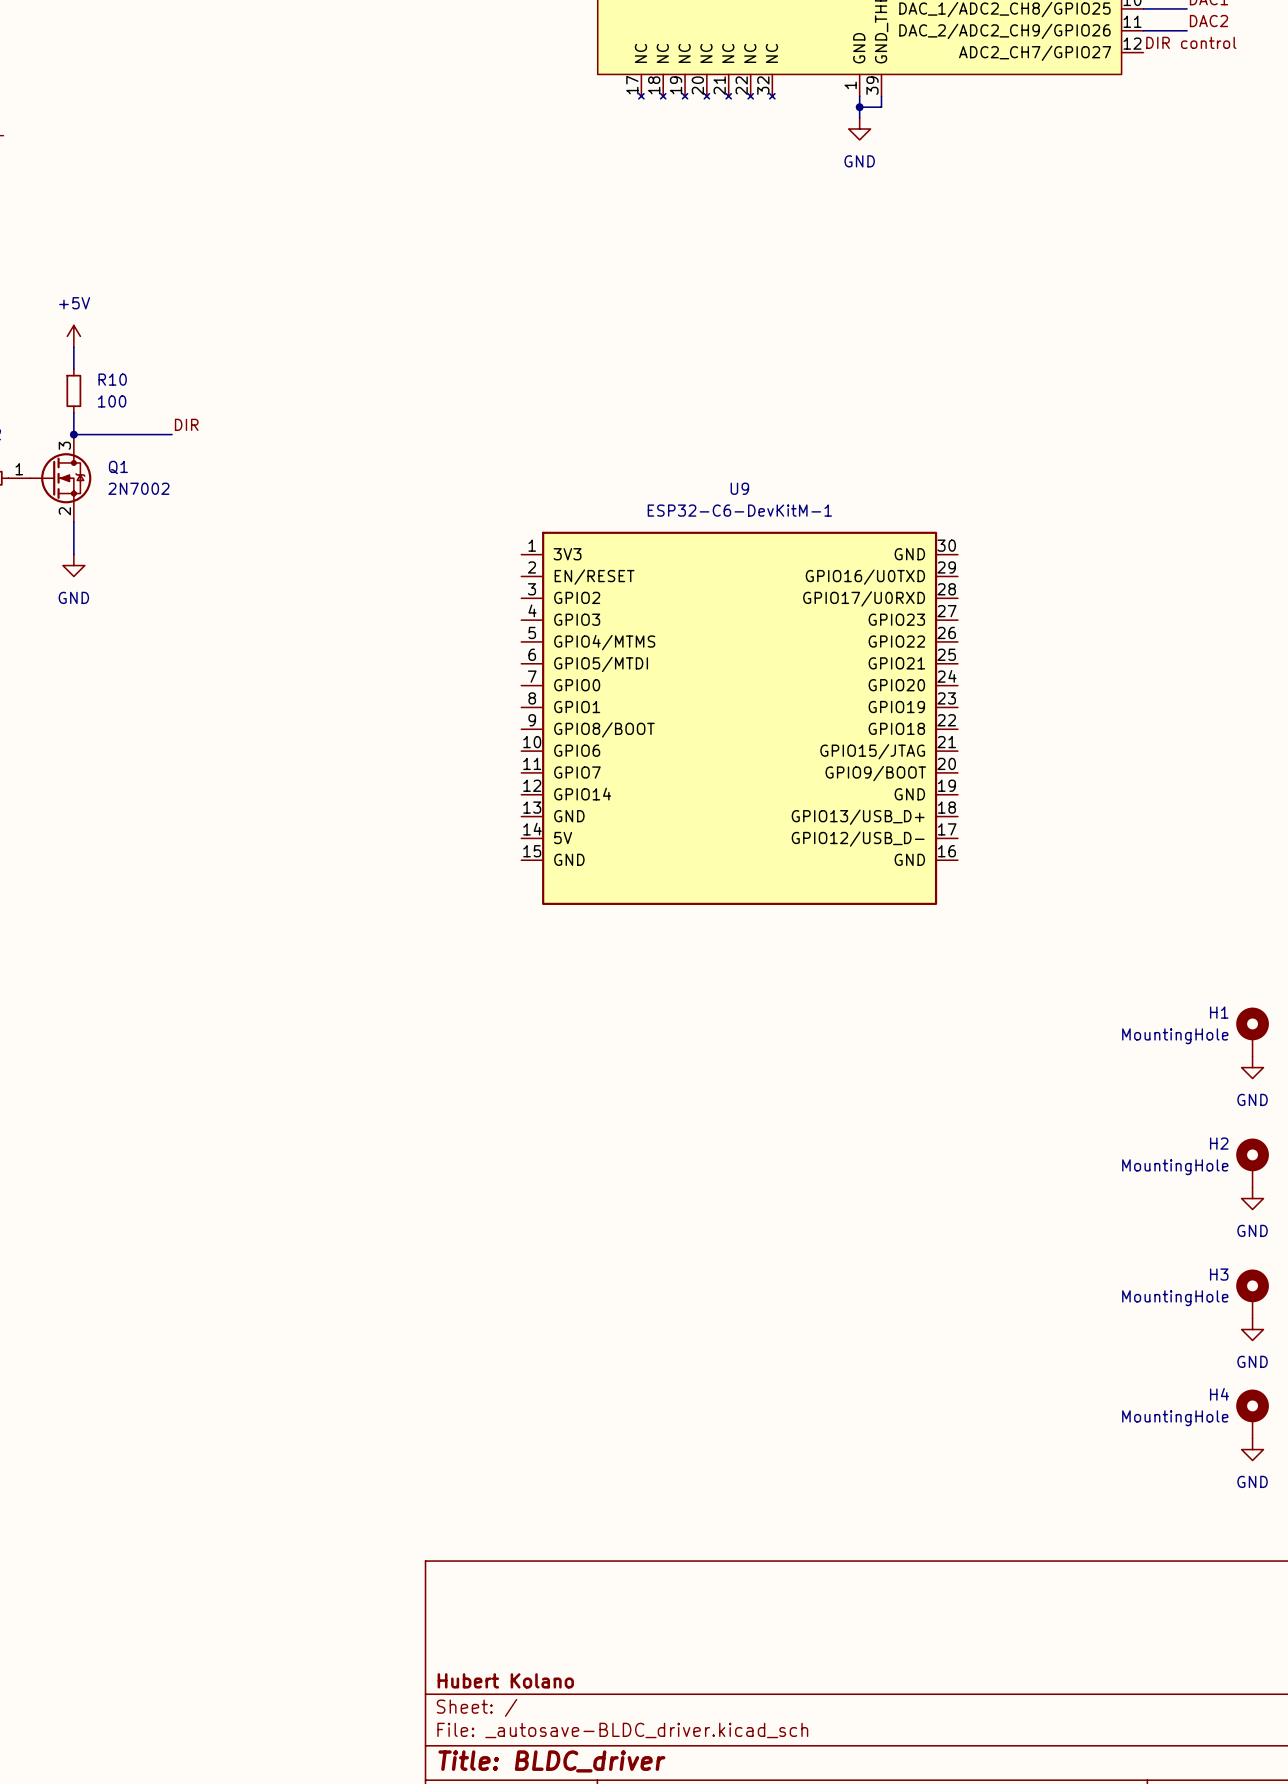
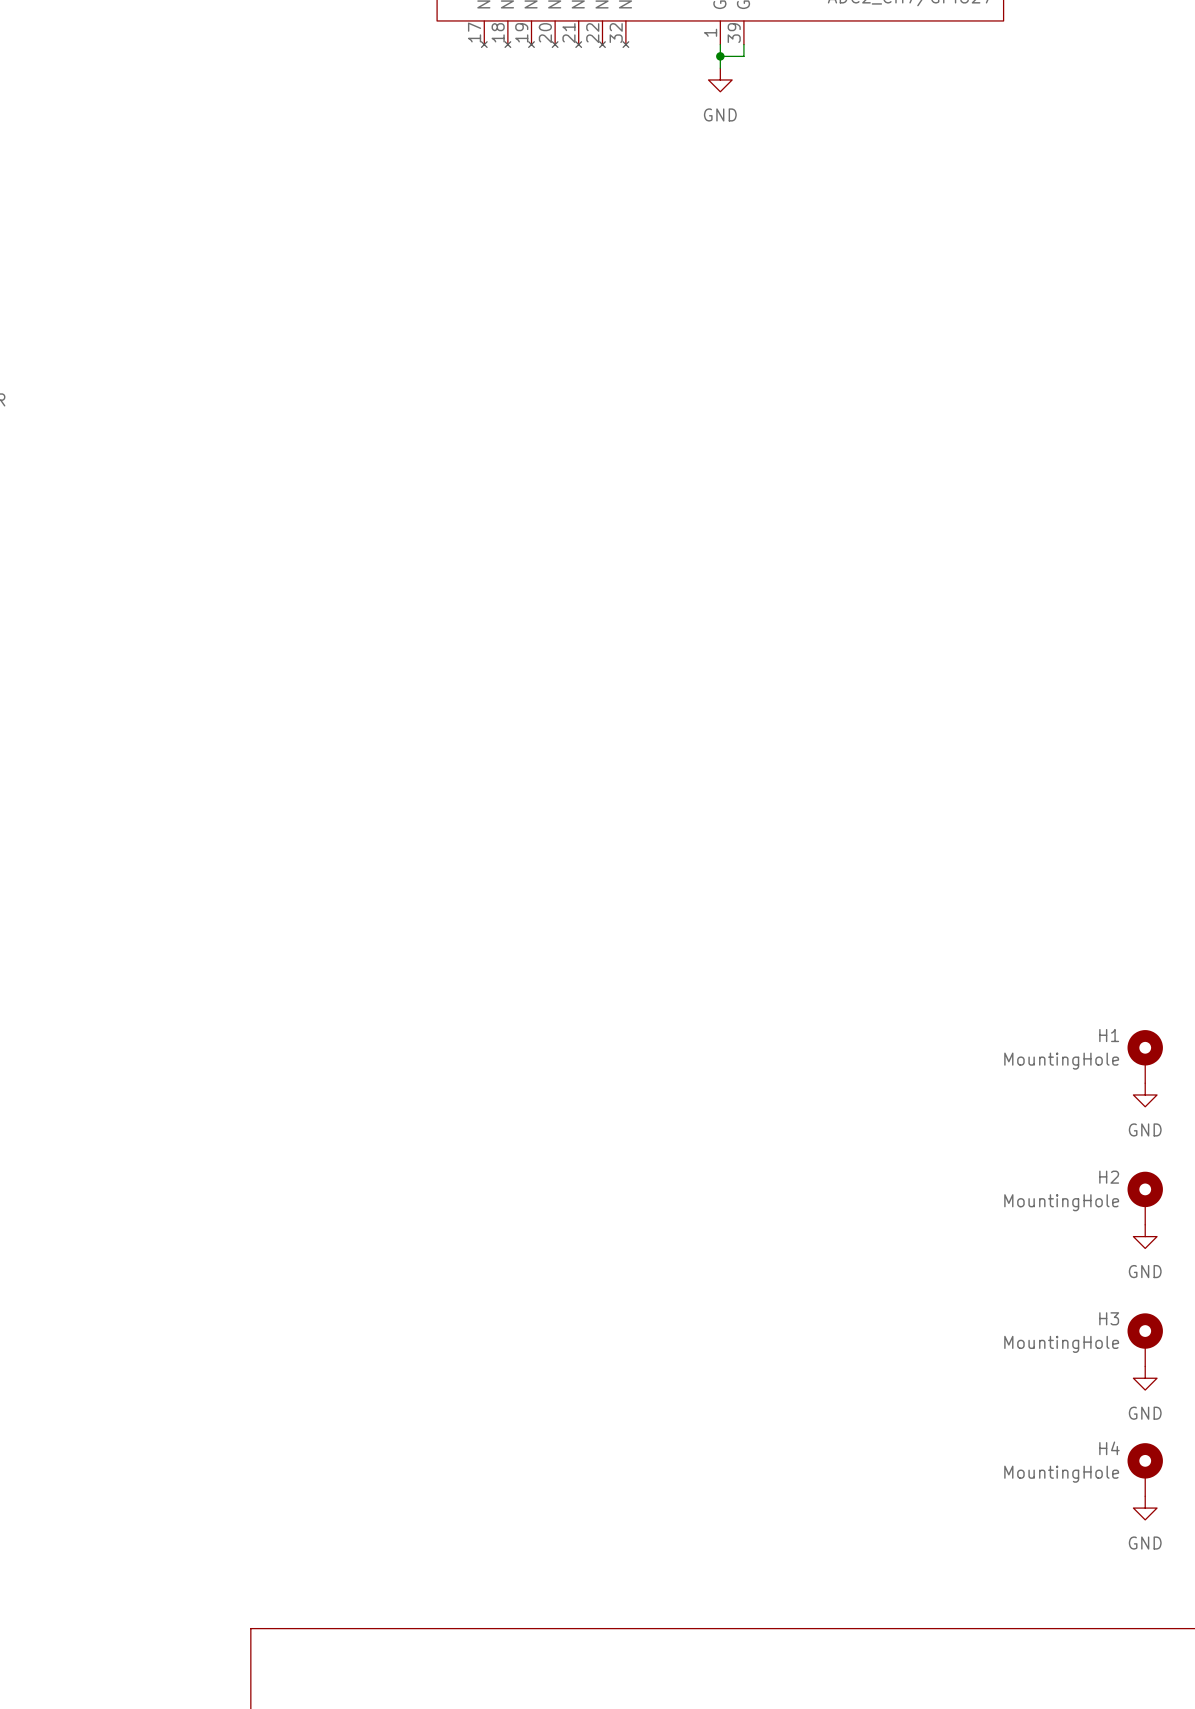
U9: ESP32-C6-DevKitM-1 (739, 718) -> none

